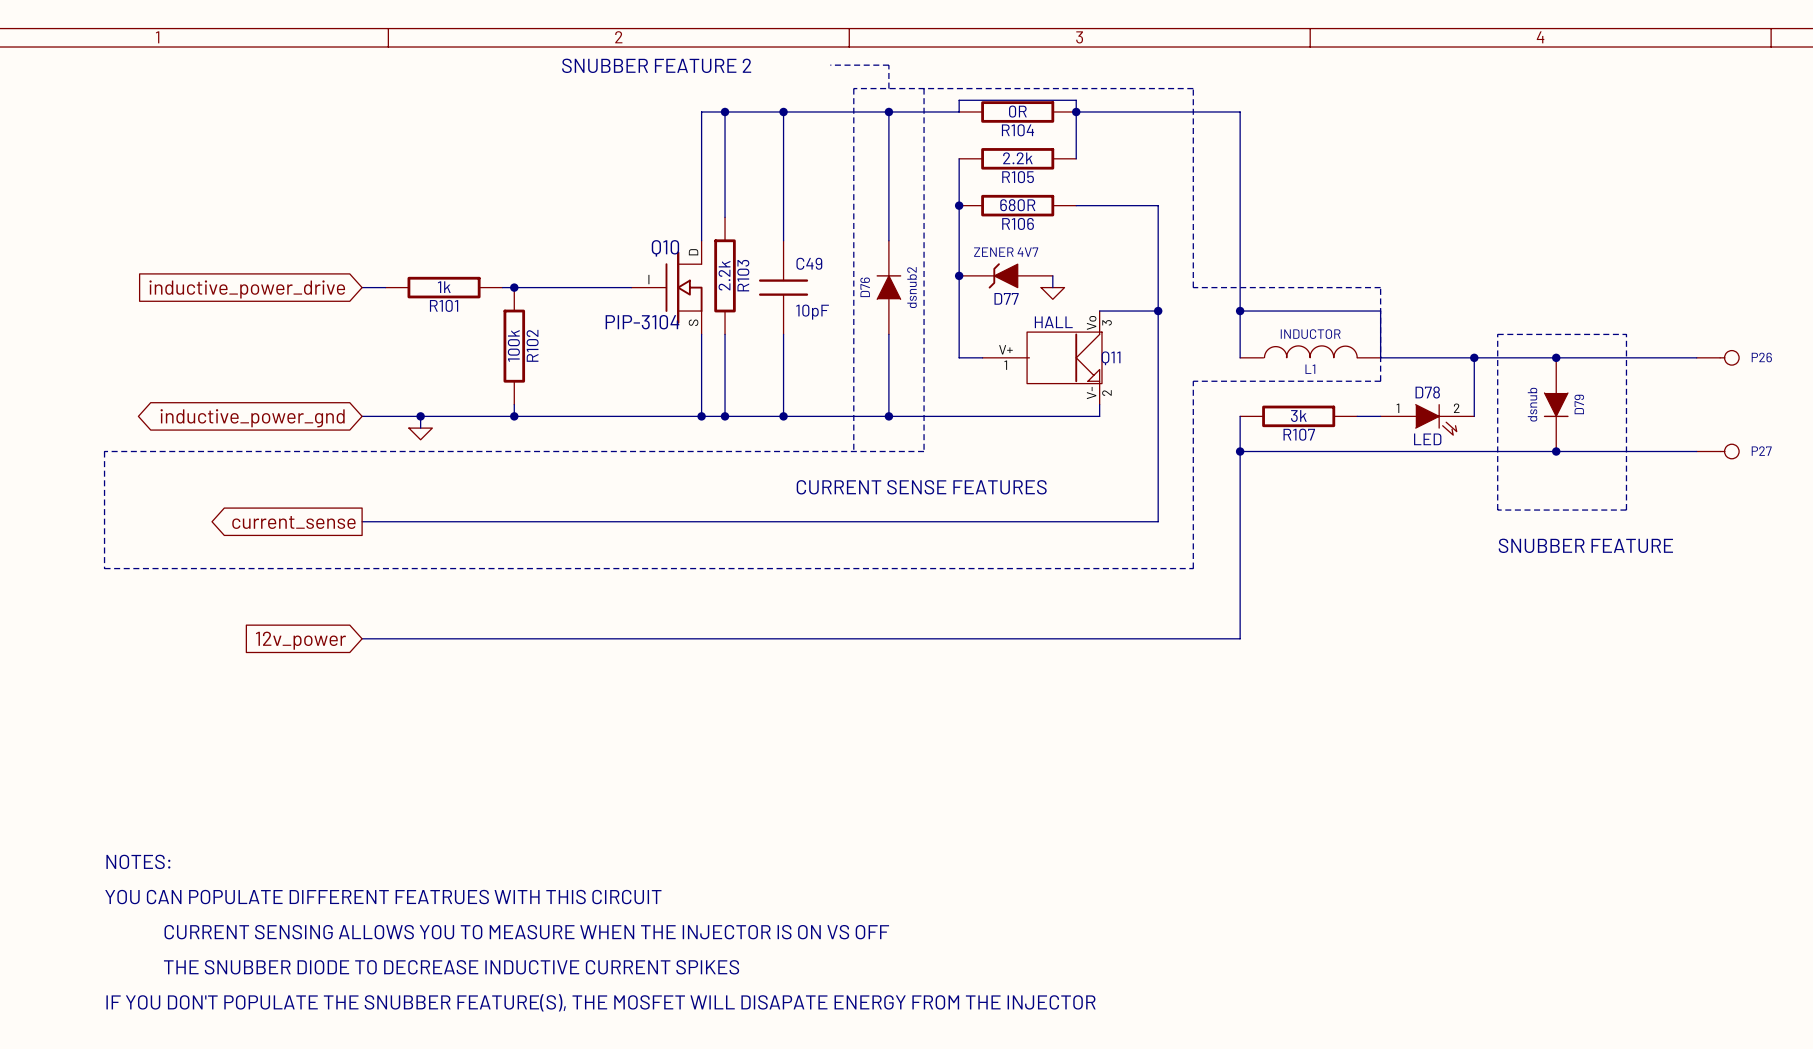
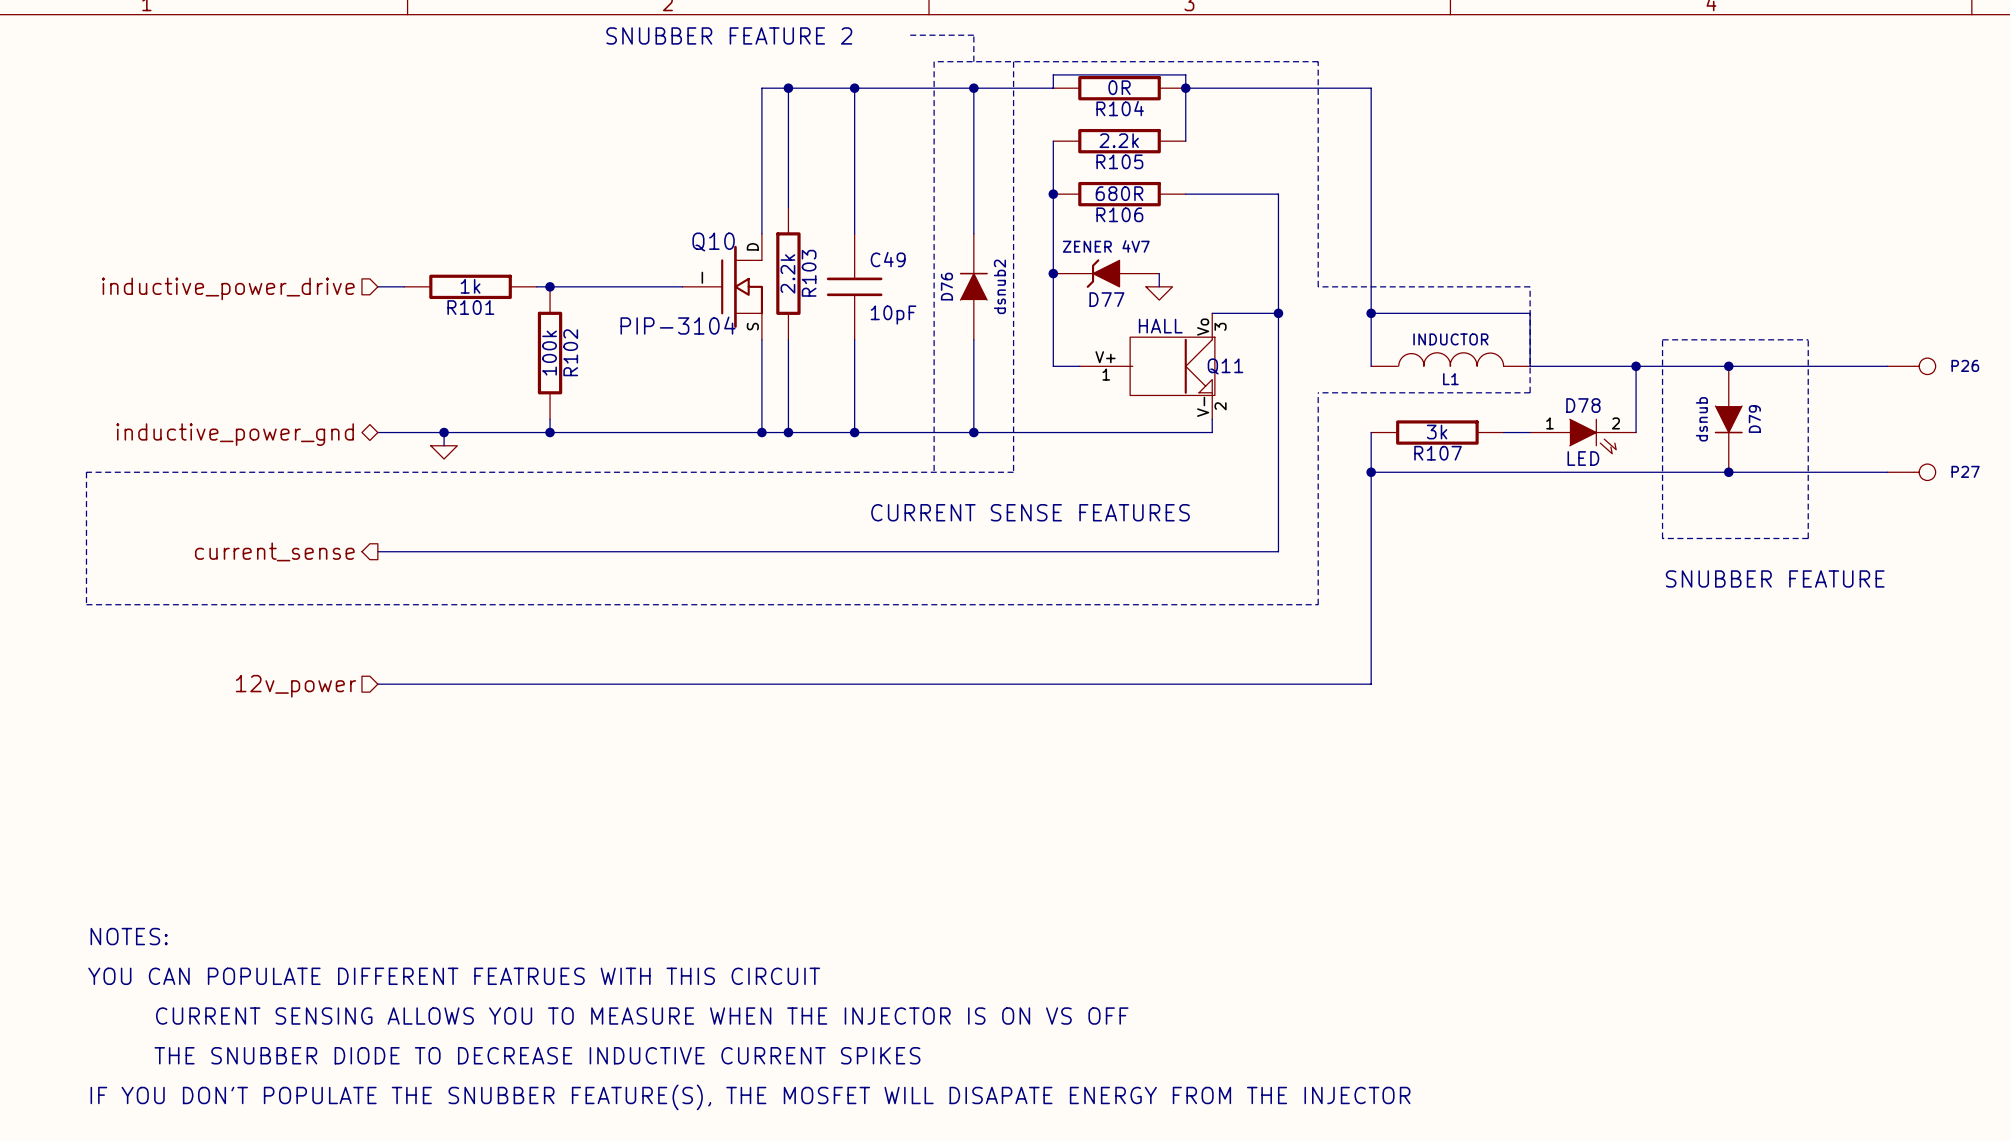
hierarchical label: none -> inductive_power_drive (228, 288)
global label: inductive_power_drive (247, 289) -> none
hierarchical label: none -> inductive_power_gnd (235, 434)
global label: inductive_power_gnd (252, 418) -> none
hierarchical label: none -> current_sense (274, 551)
global label: current_sense (293, 522) -> none
hierarchical label: none -> 12v_power (296, 686)
global label: 12v_power (300, 640) -> none

